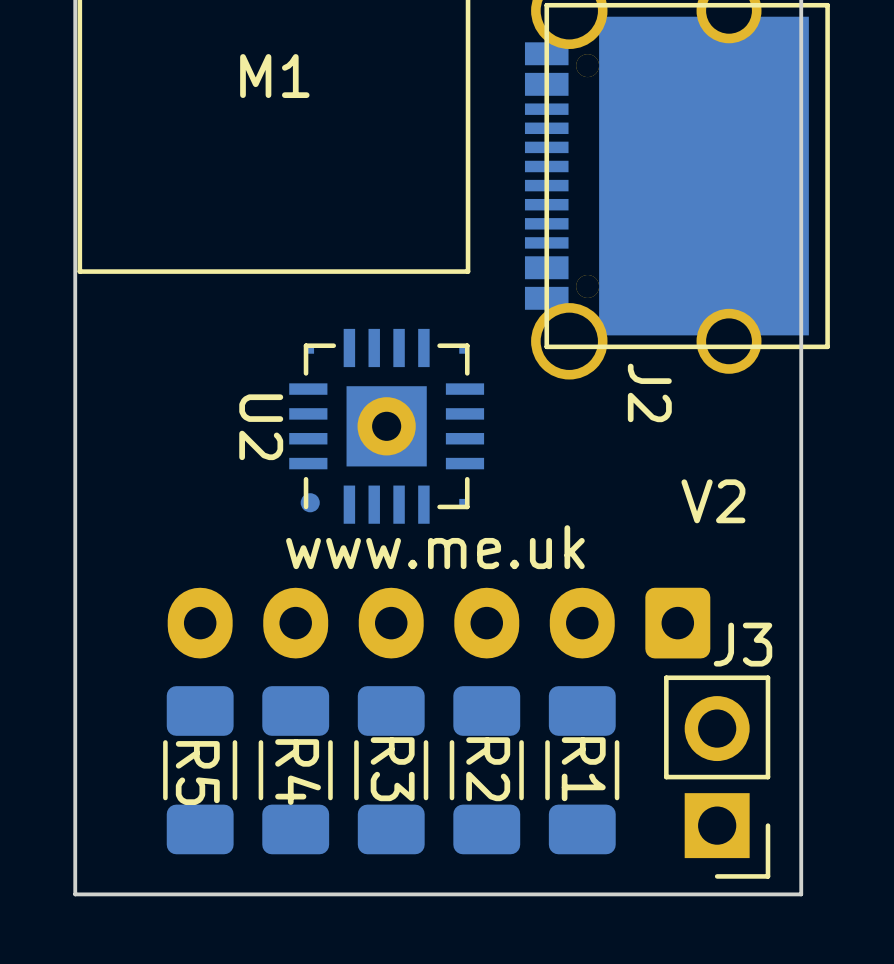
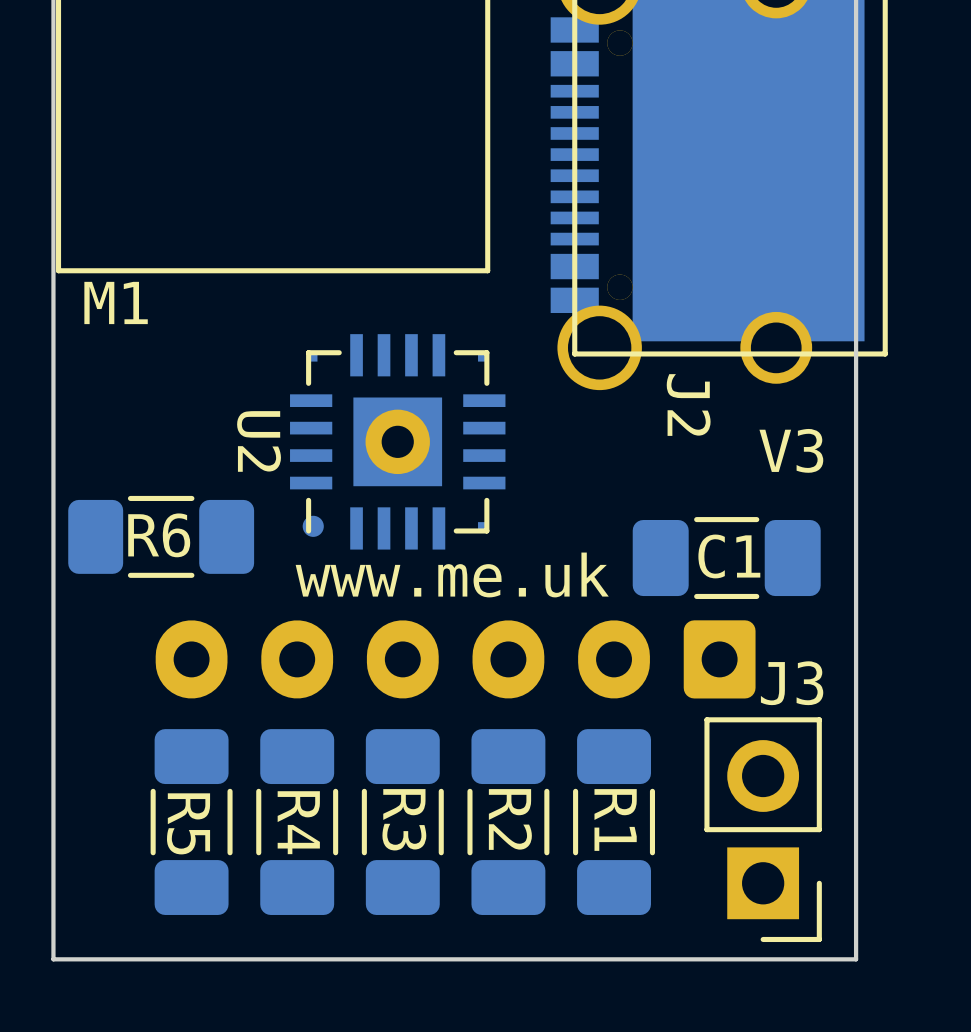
M1 name position: M1 (274, 76) -> M1 (116, 302)
text: none -> V3 (791, 450)
text: V2 (713, 501) -> none
R6: none -> (161, 536)
C1: none -> (726, 558)

